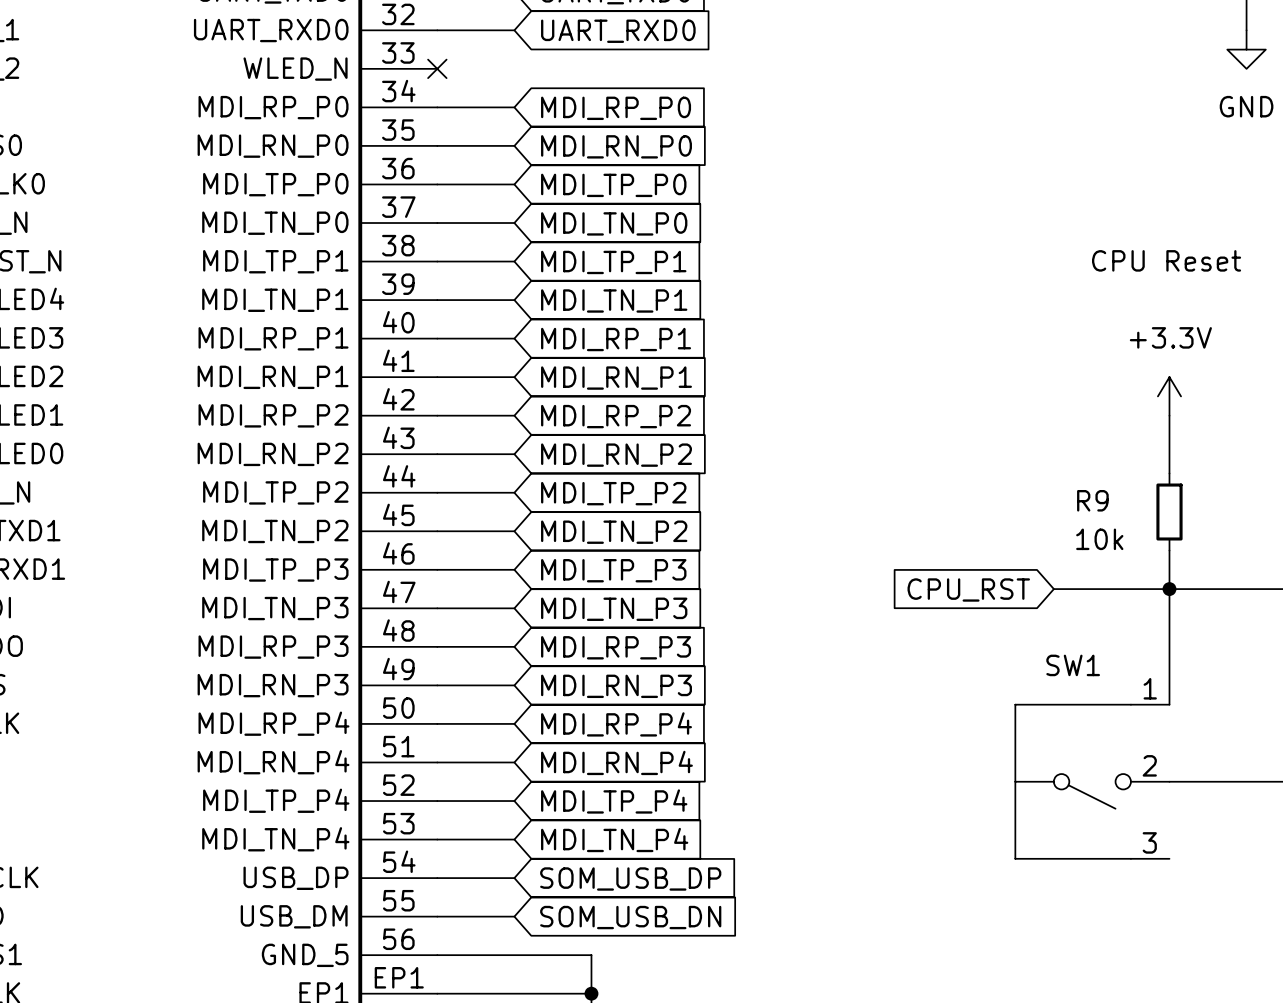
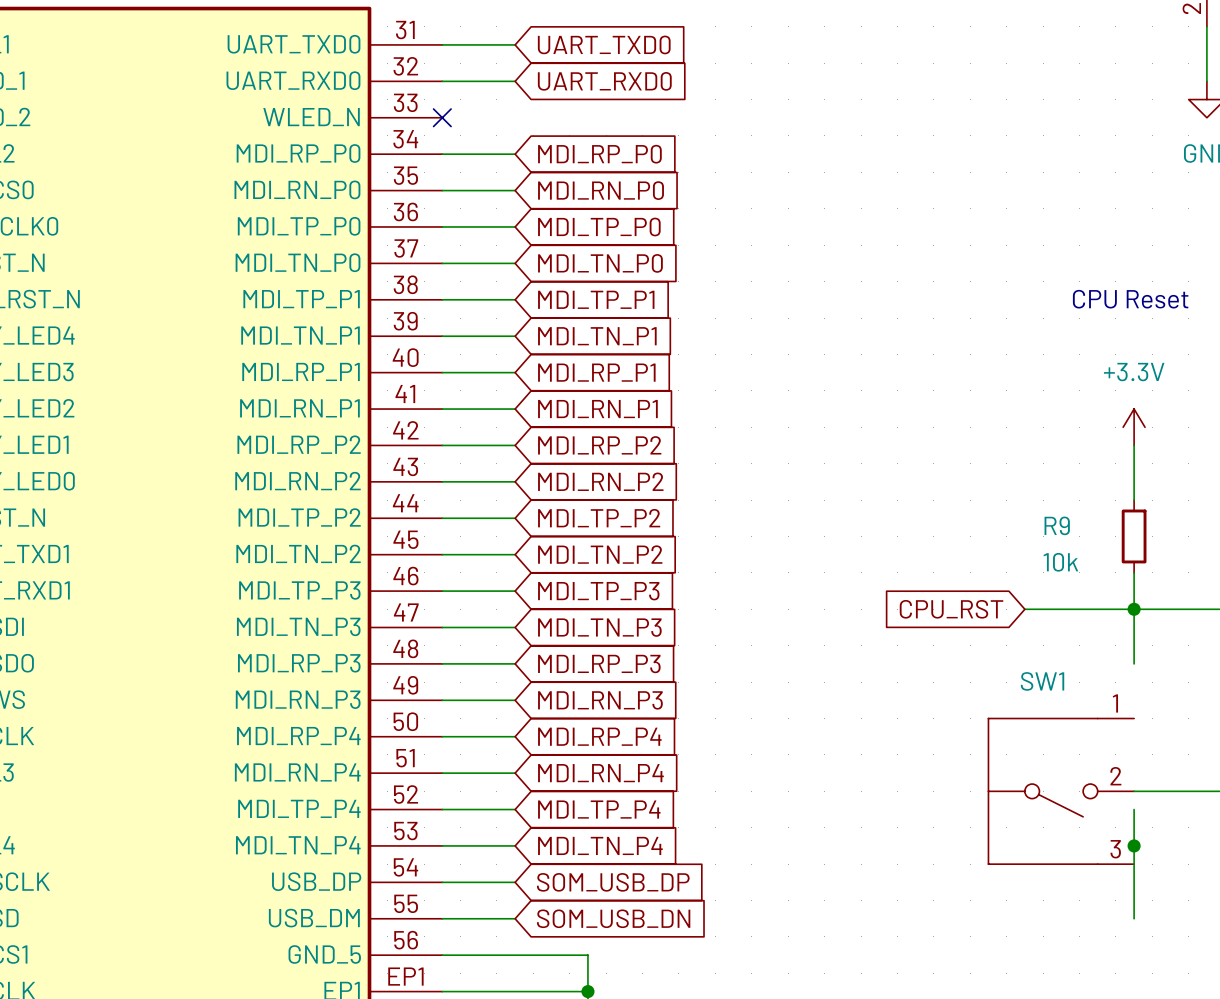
wire: (1169, 646) (1169, 704) -> none
wire: none -> (1134, 809) (1134, 918)
junction: none -> (1134, 845)

